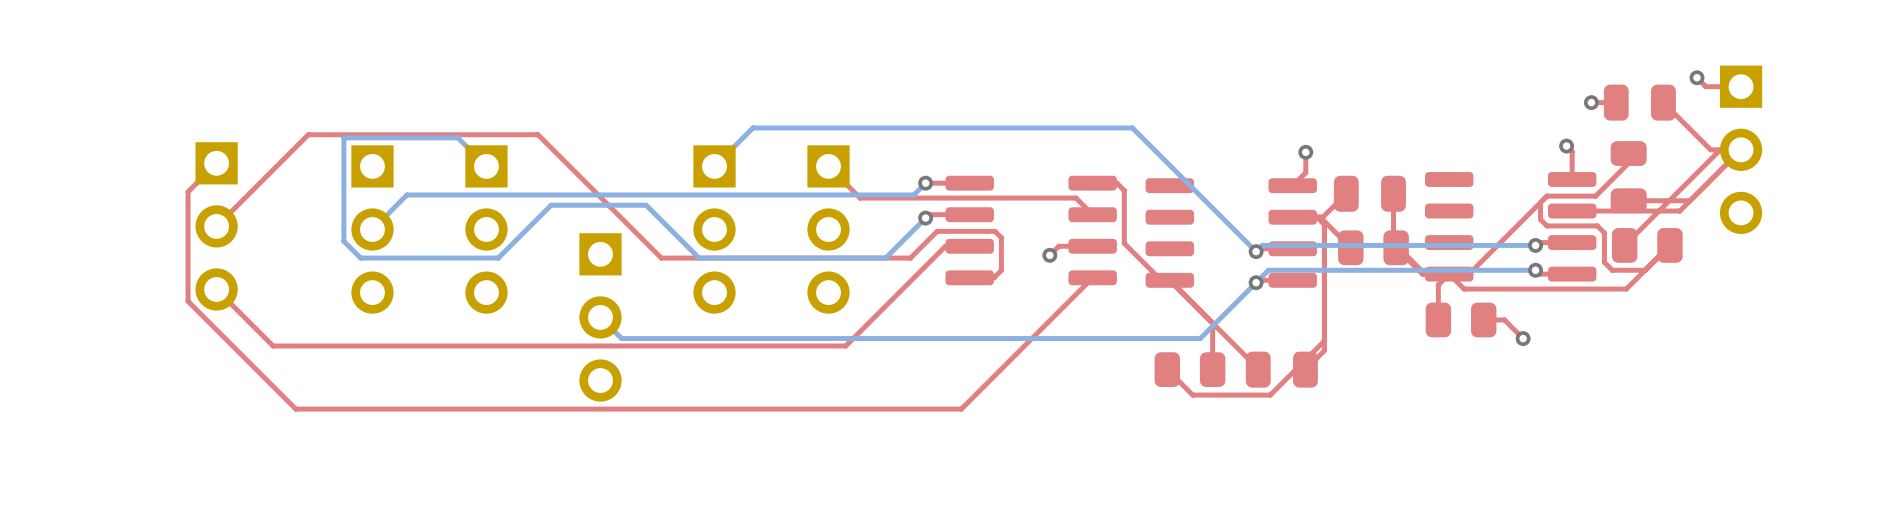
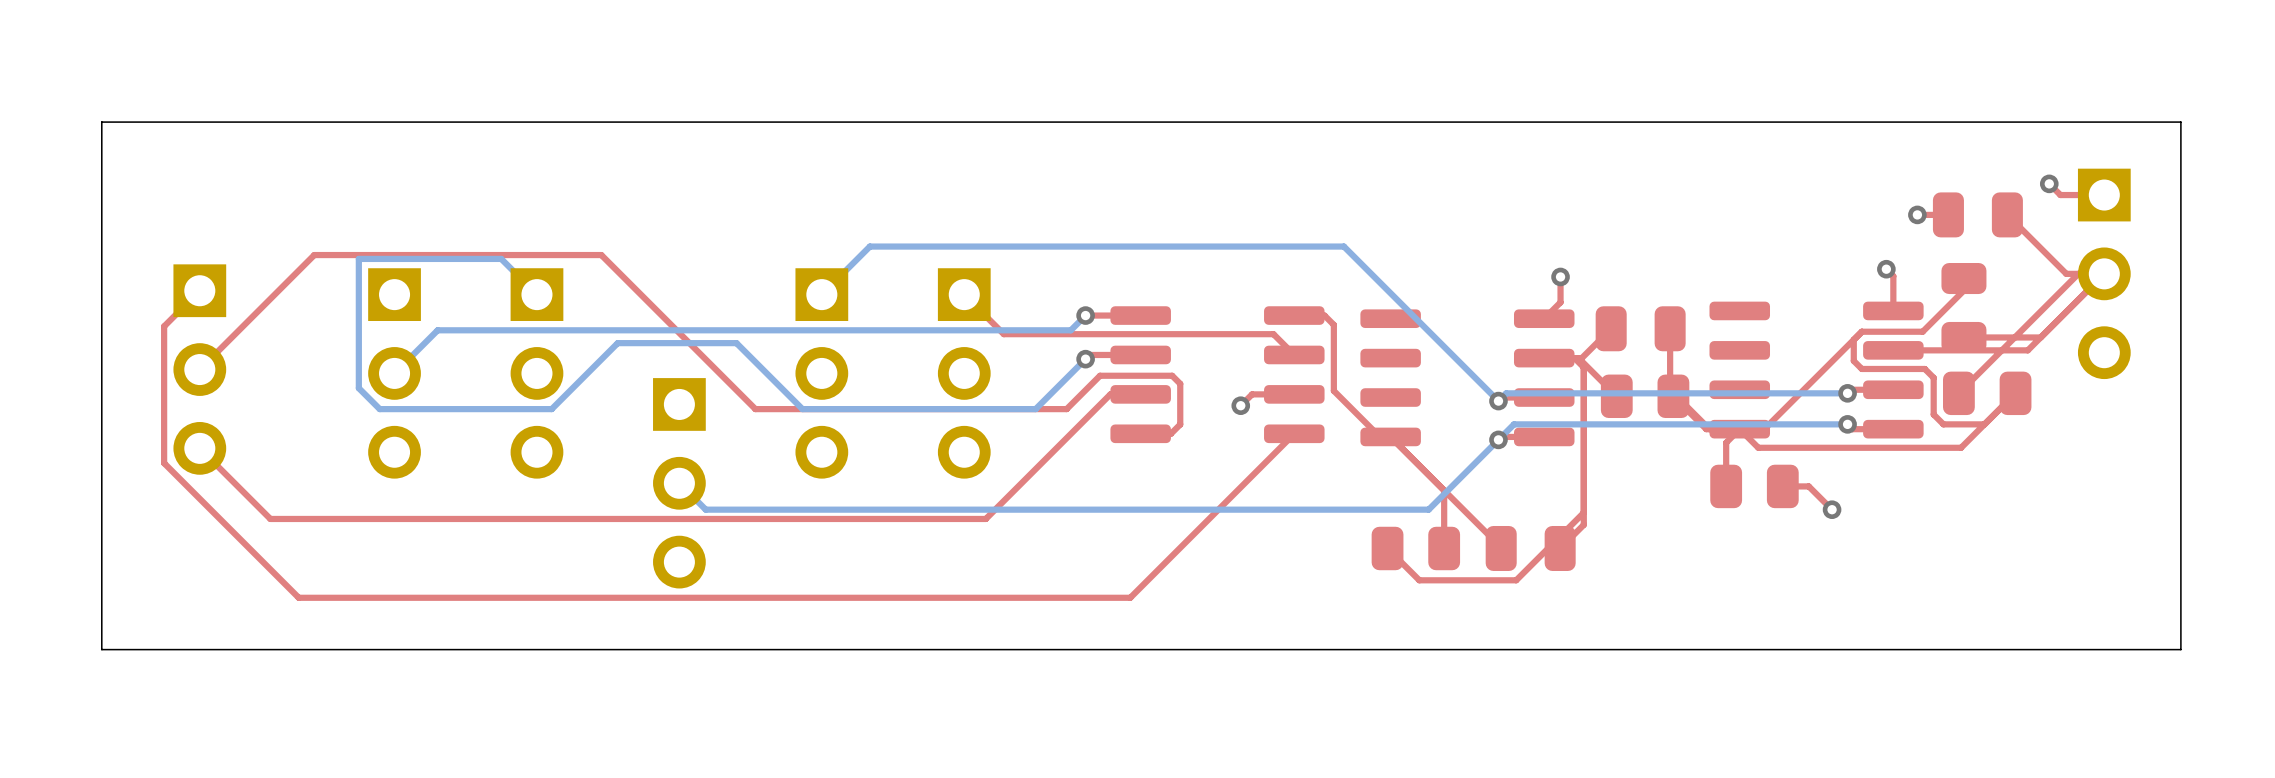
board edge: none -> (2180, 122) (101, 122) (101, 649) (2180, 649) (2180, 122)

